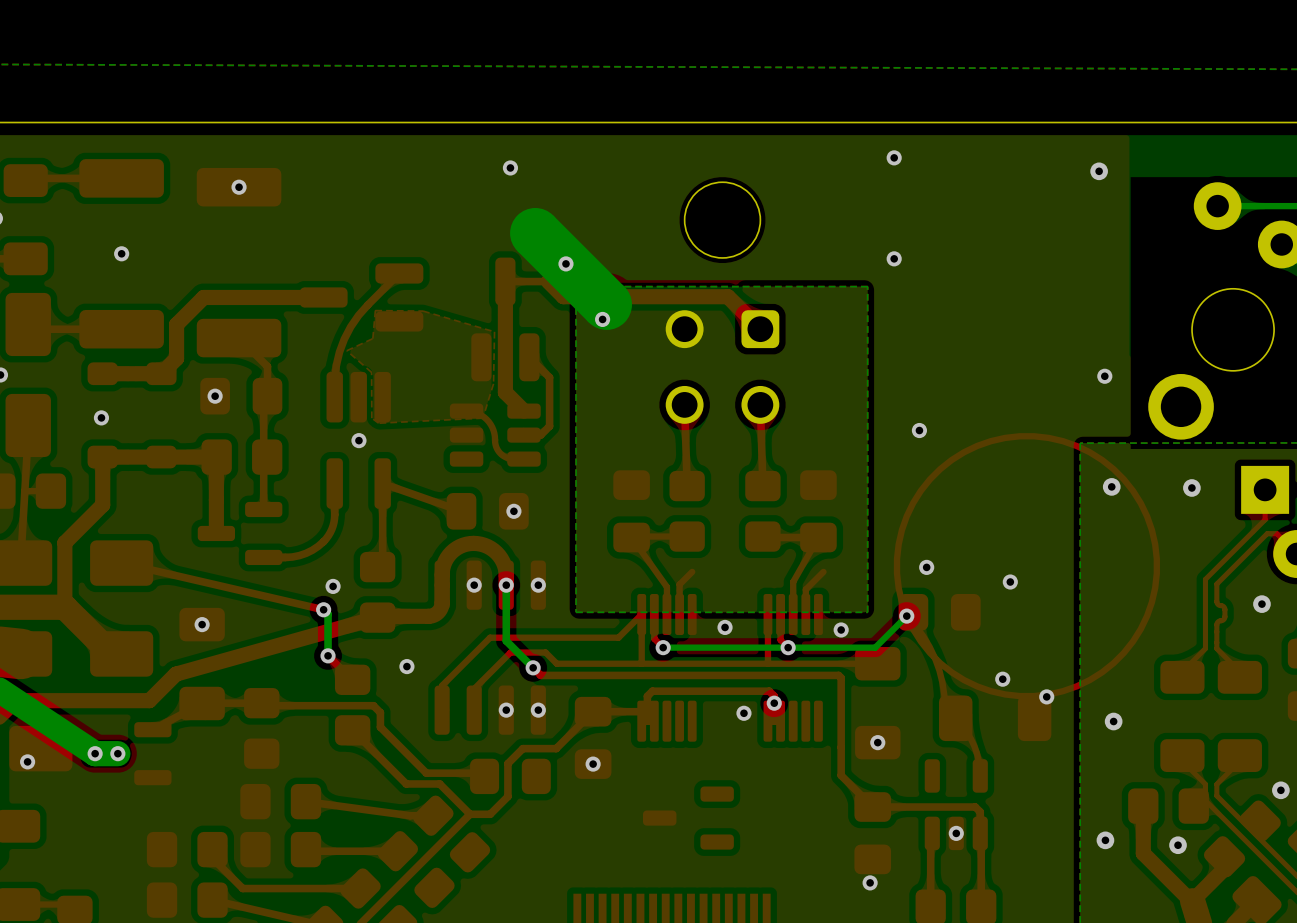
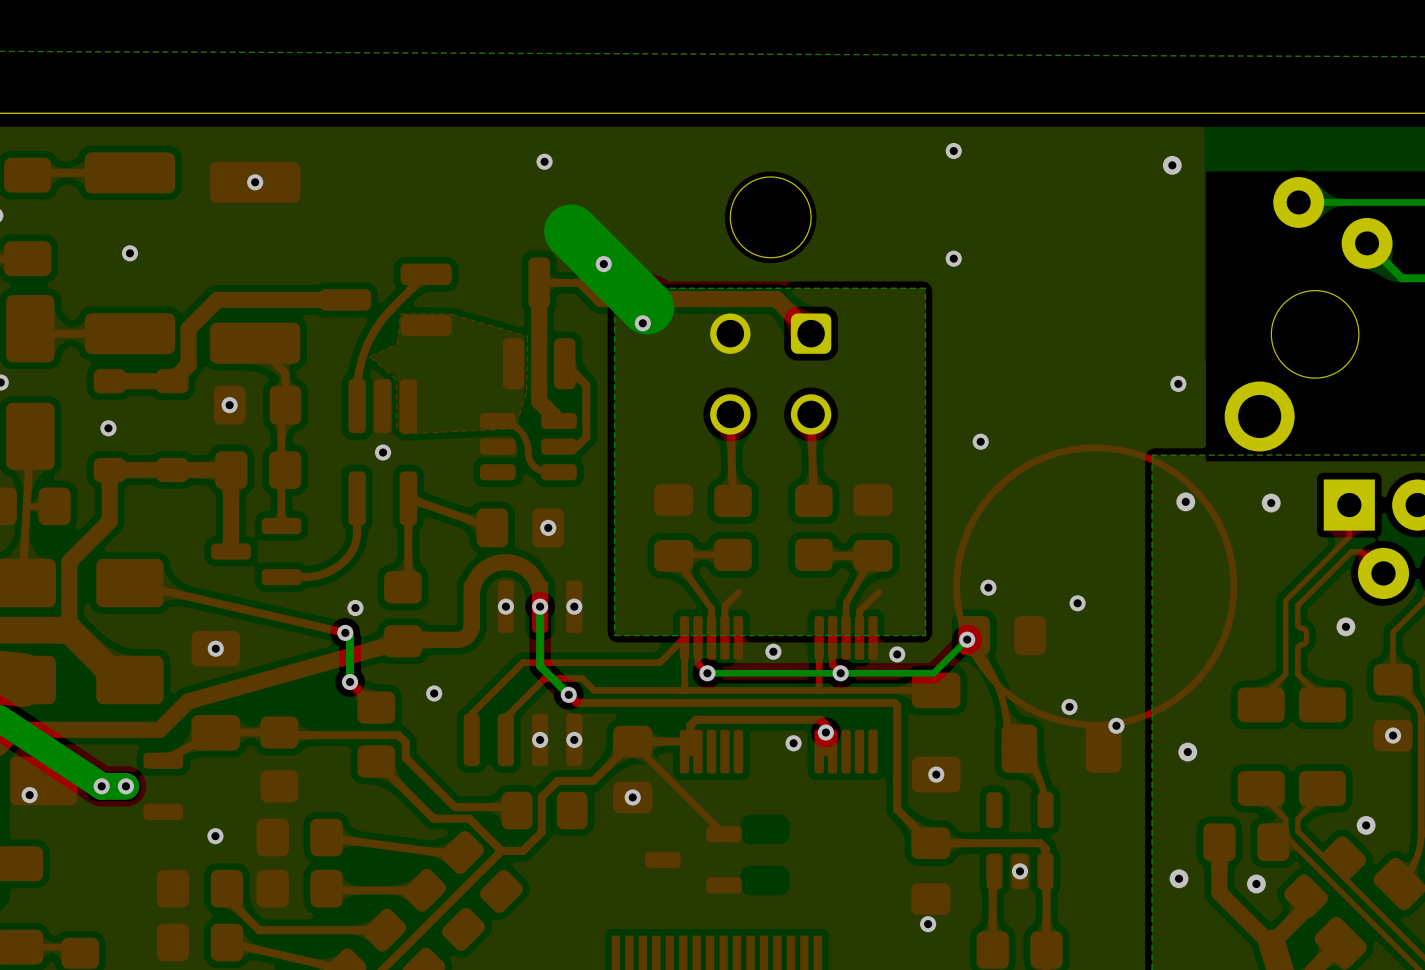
top track: none -> (632, 741) (724, 834)
via: none -> (215, 836)
part position: (688, 818) -> (693, 859)

